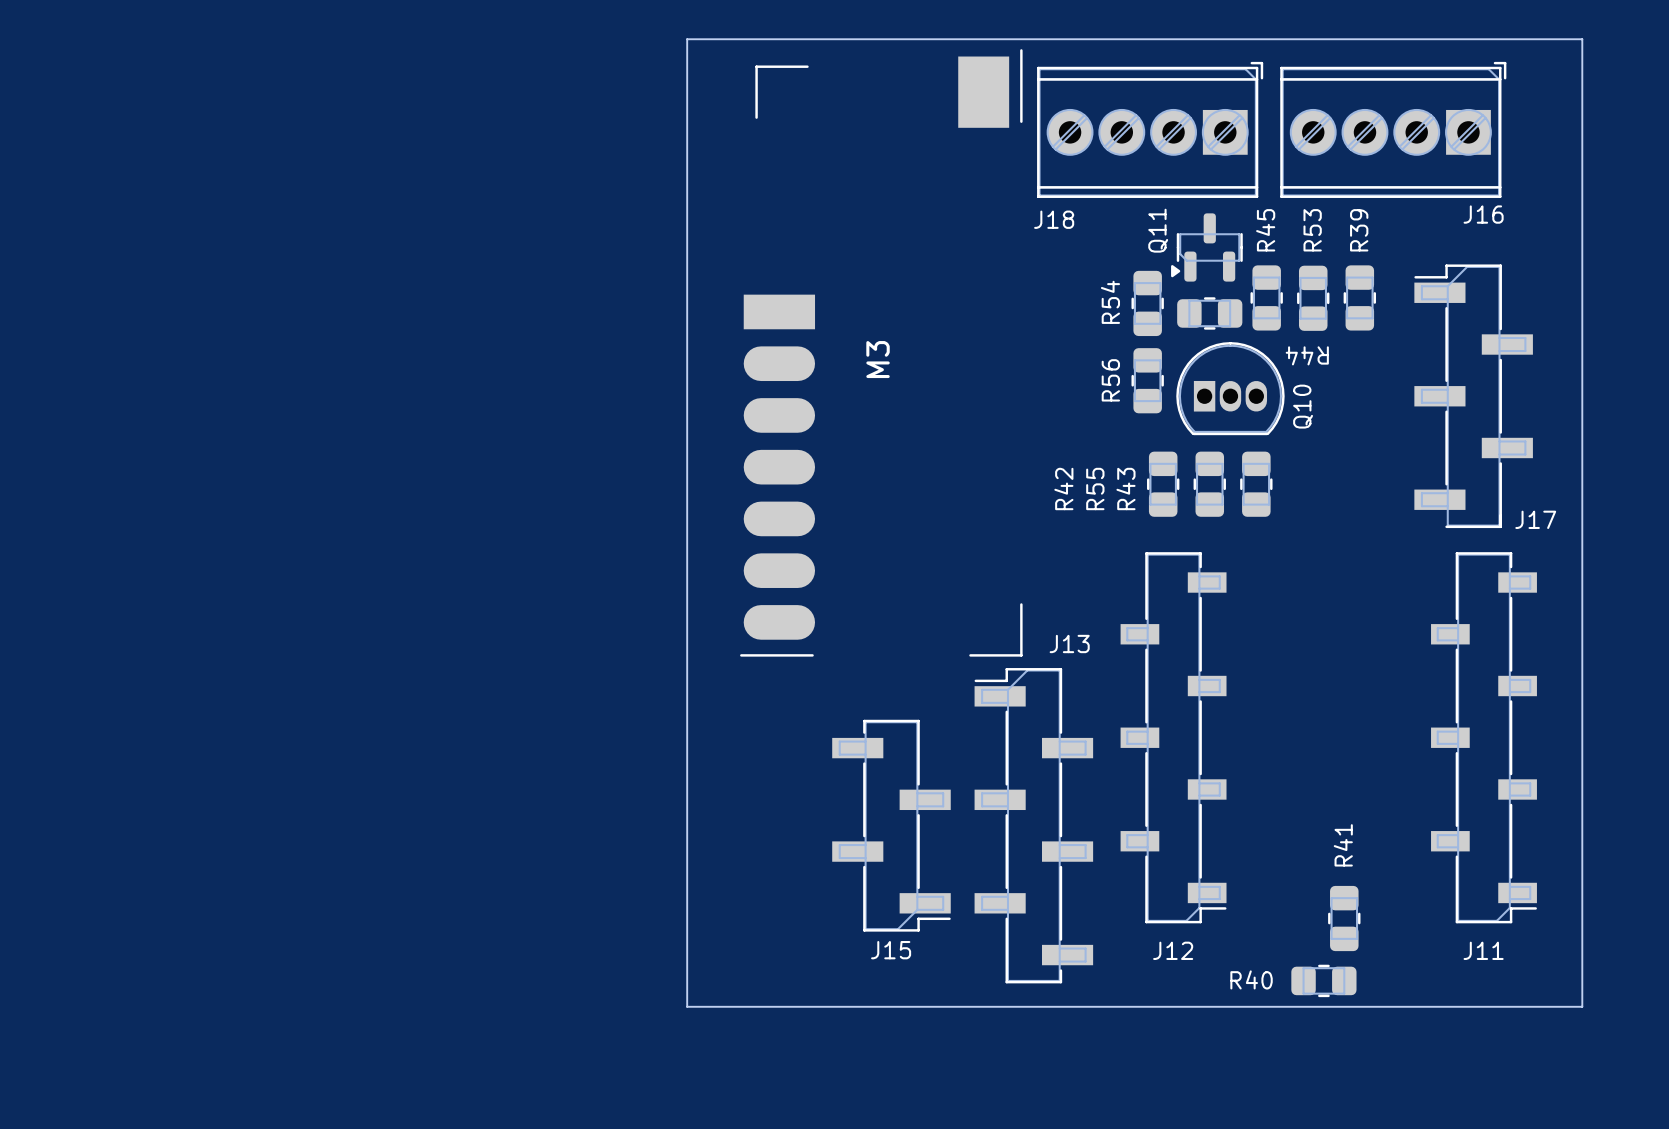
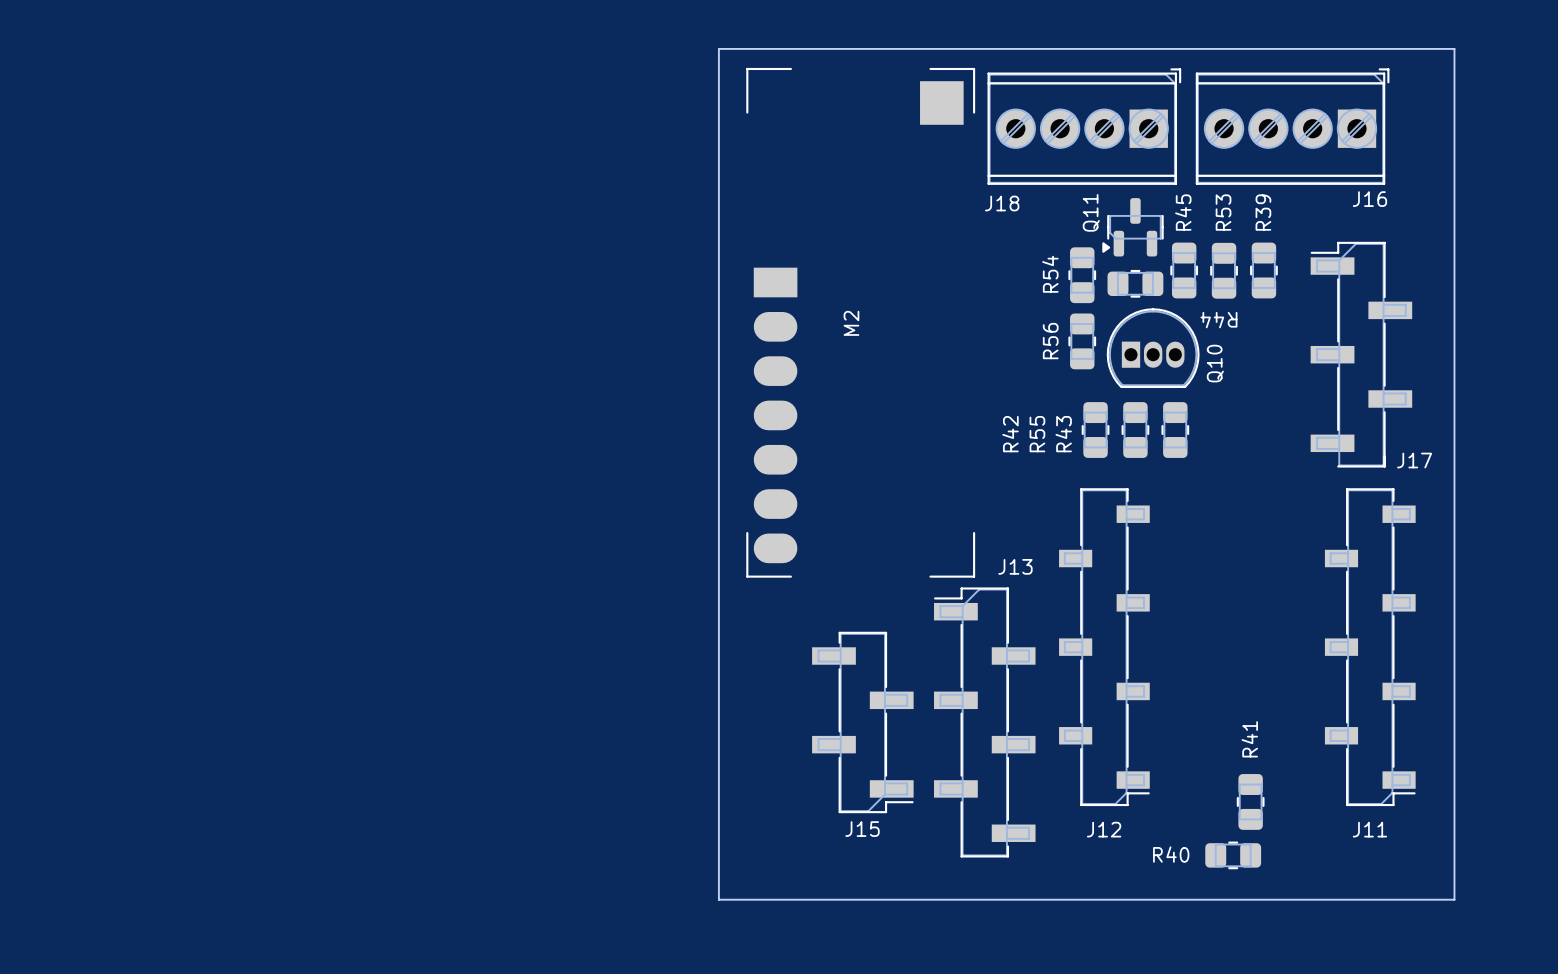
board edge: (723, 39) (687, 39) (687, 1006) (1582, 1006) -> (718, 48) (718, 899) (1454, 899) (1454, 877)
M3: (881, 352) -> none
M2: none -> (860, 322)

